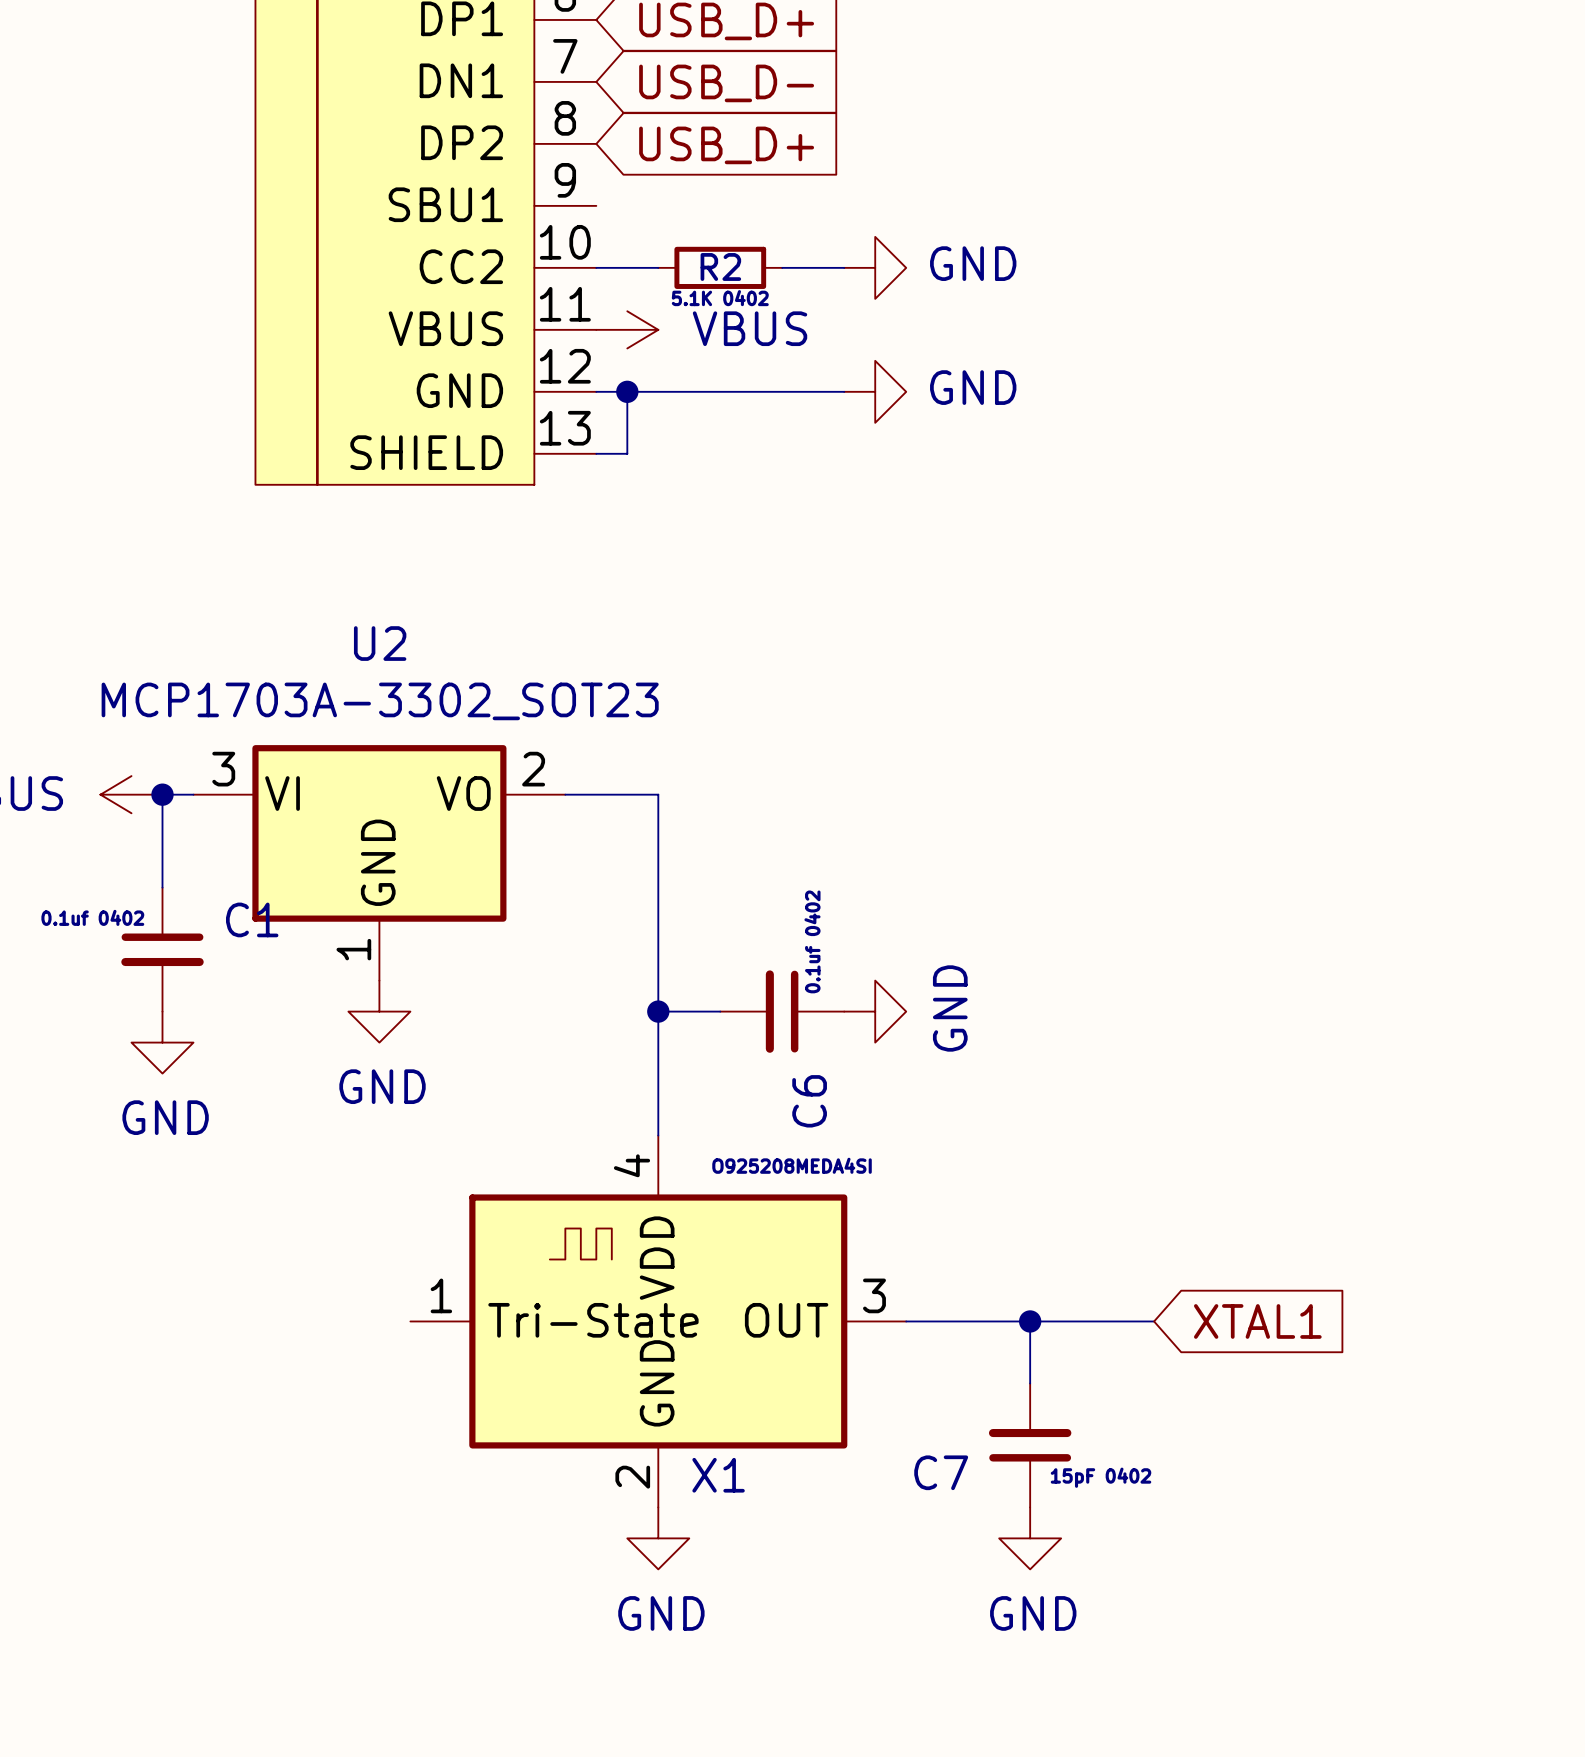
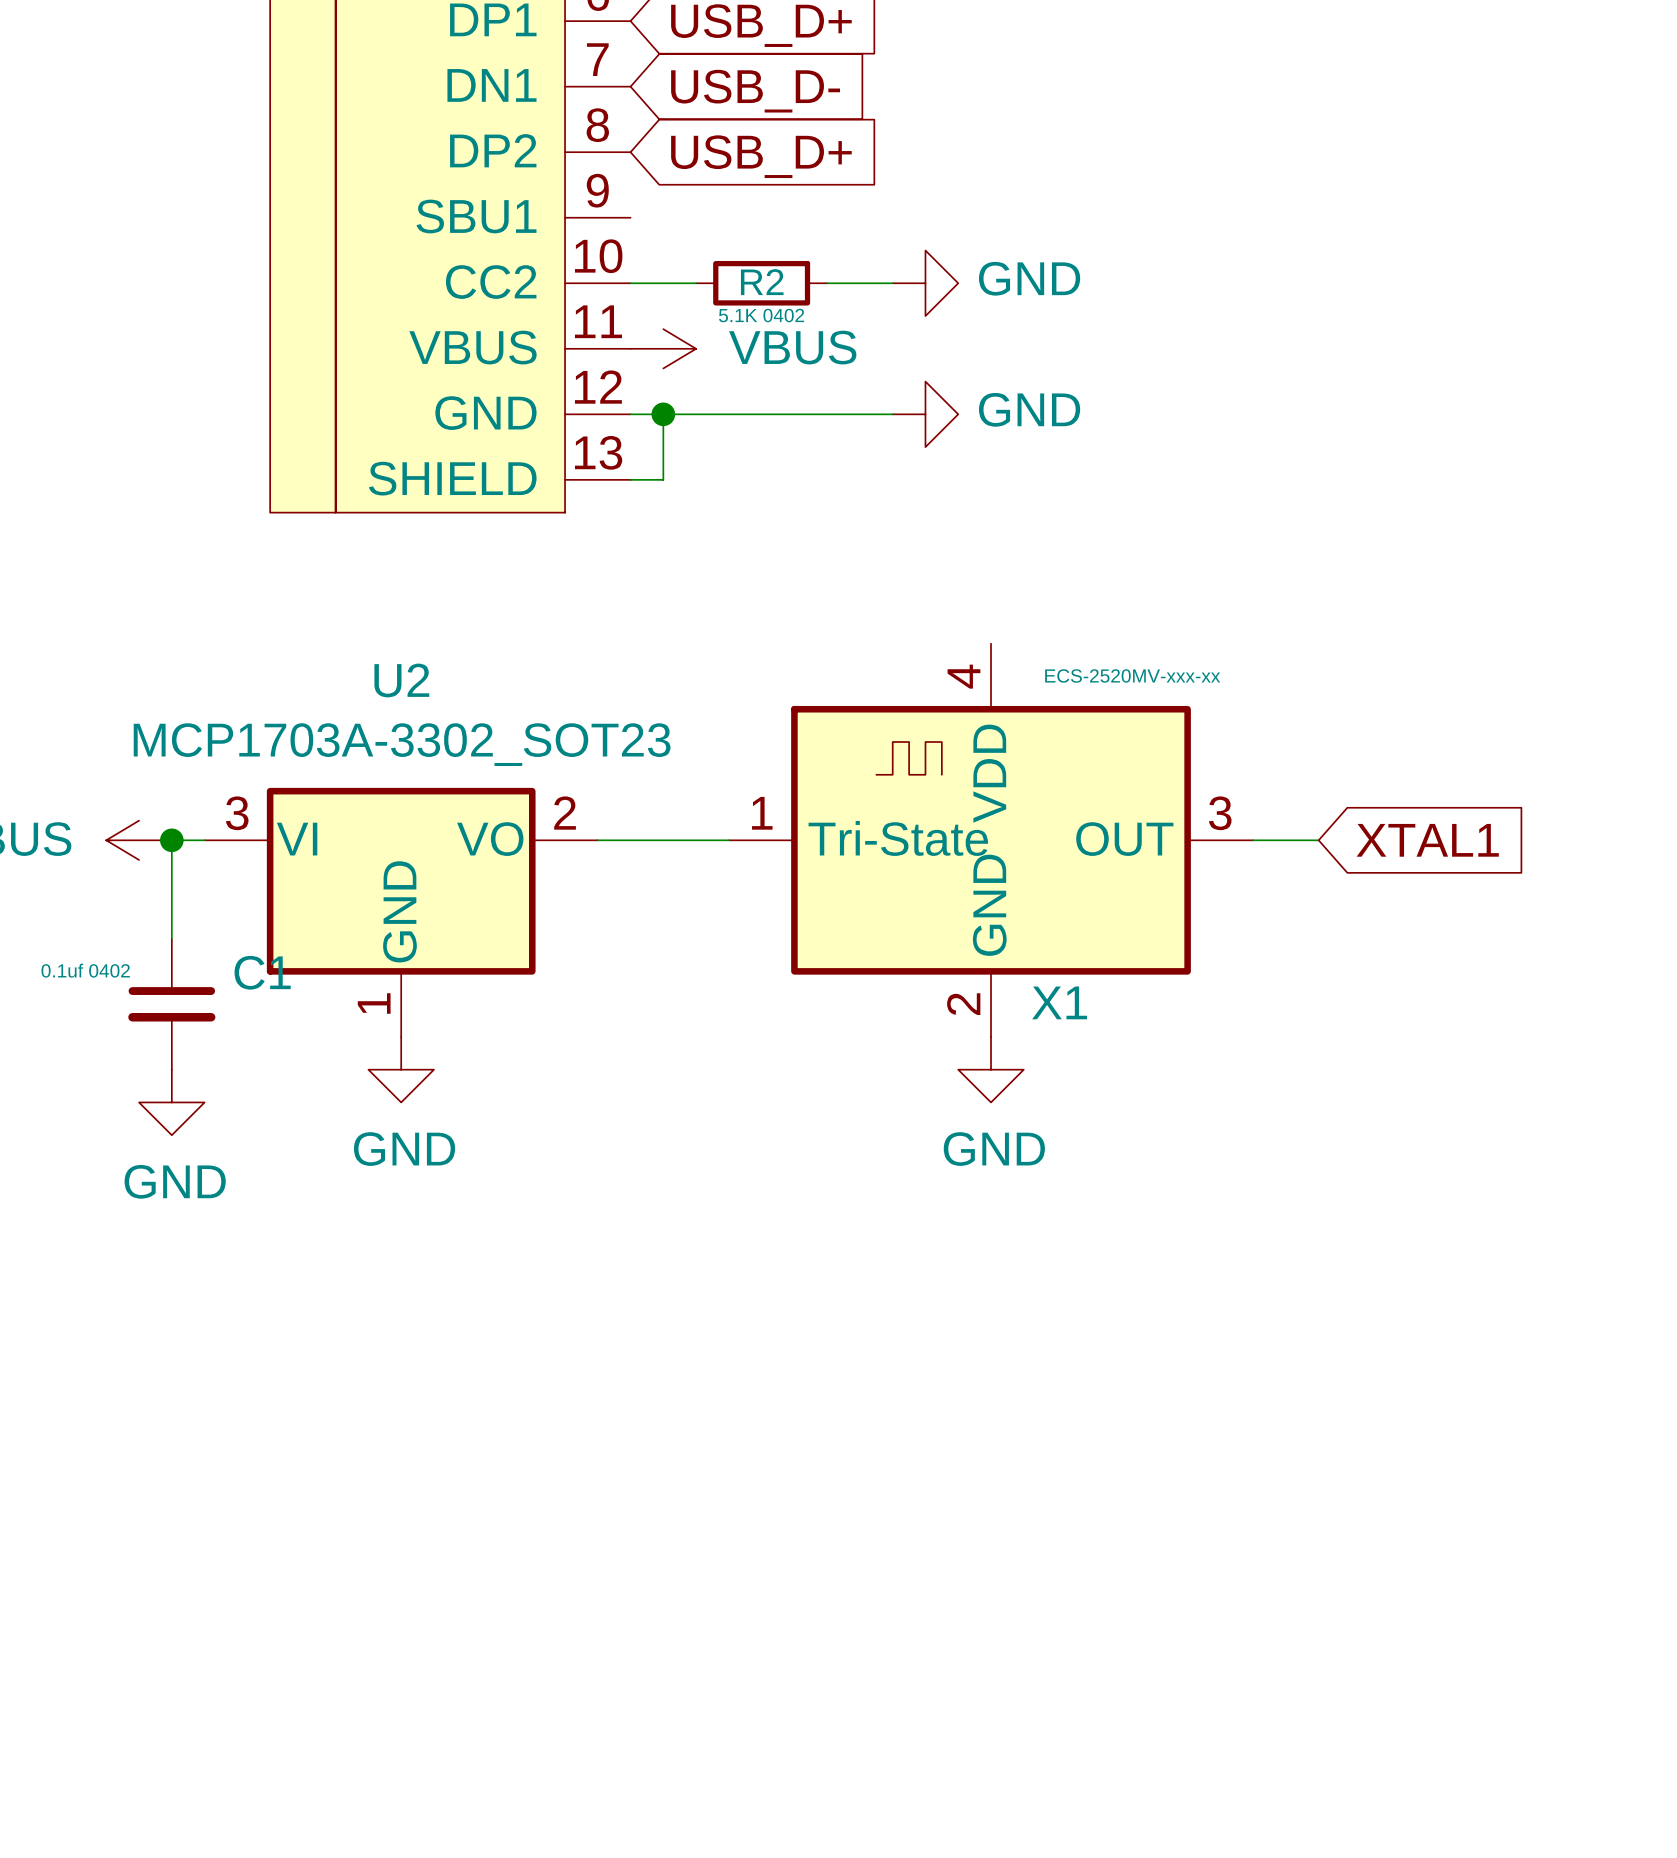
wire: (658, 794) (658, 1135) -> (696, 840) (728, 840)
wire: (658, 1011) (720, 1011) -> (1253, 840) (1318, 840)
junction: (658, 1011) -> none
C6: 0.1uf 0402 (782, 1011) -> none
power symbol rotation: 0° (875, 1011) -> 90° clockwise (991, 1069)
power symbol position: GND (875, 1011) -> GND (991, 1069)
X1 value: O925208MEDA4SI (792, 1165) -> ECS-2520MV-xxx-xx (1132, 675)
X1 position: (658, 1321) -> (991, 840)
wire: (906, 1321) (1154, 1321) -> none
wire: (1030, 1321) (1030, 1383) -> none
junction: (1030, 1321) -> none
global label position: XTAL1 (1257, 1321) -> XTAL1 (1427, 840)
C7: 15pF 0402 (1030, 1445) -> none
power symbol: GND (658, 1538) -> none
power symbol: GND (1030, 1538) -> none

